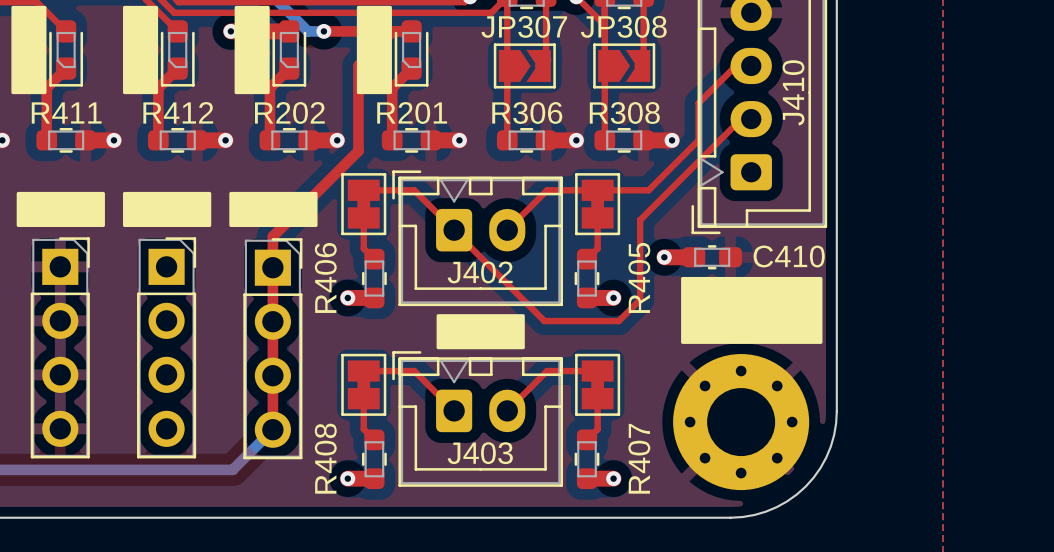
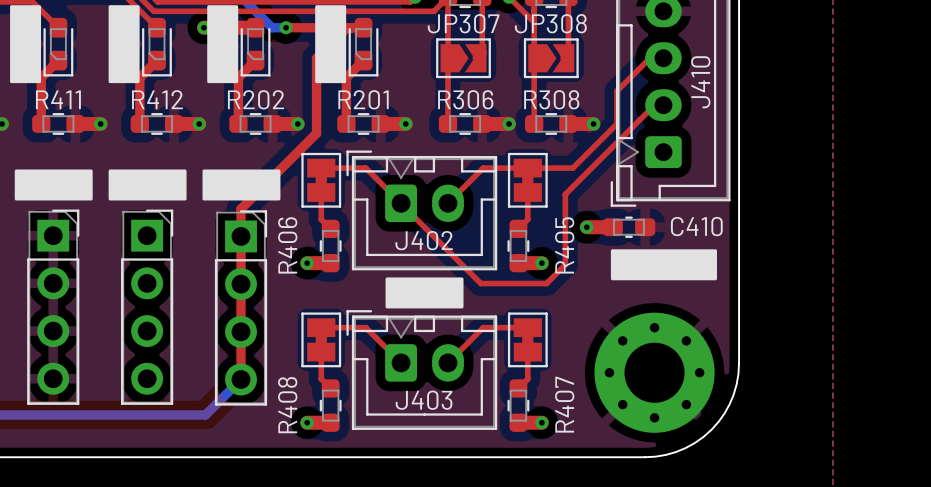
drawing shape: [681, 276, 823, 344] -> [610, 249, 717, 281]

